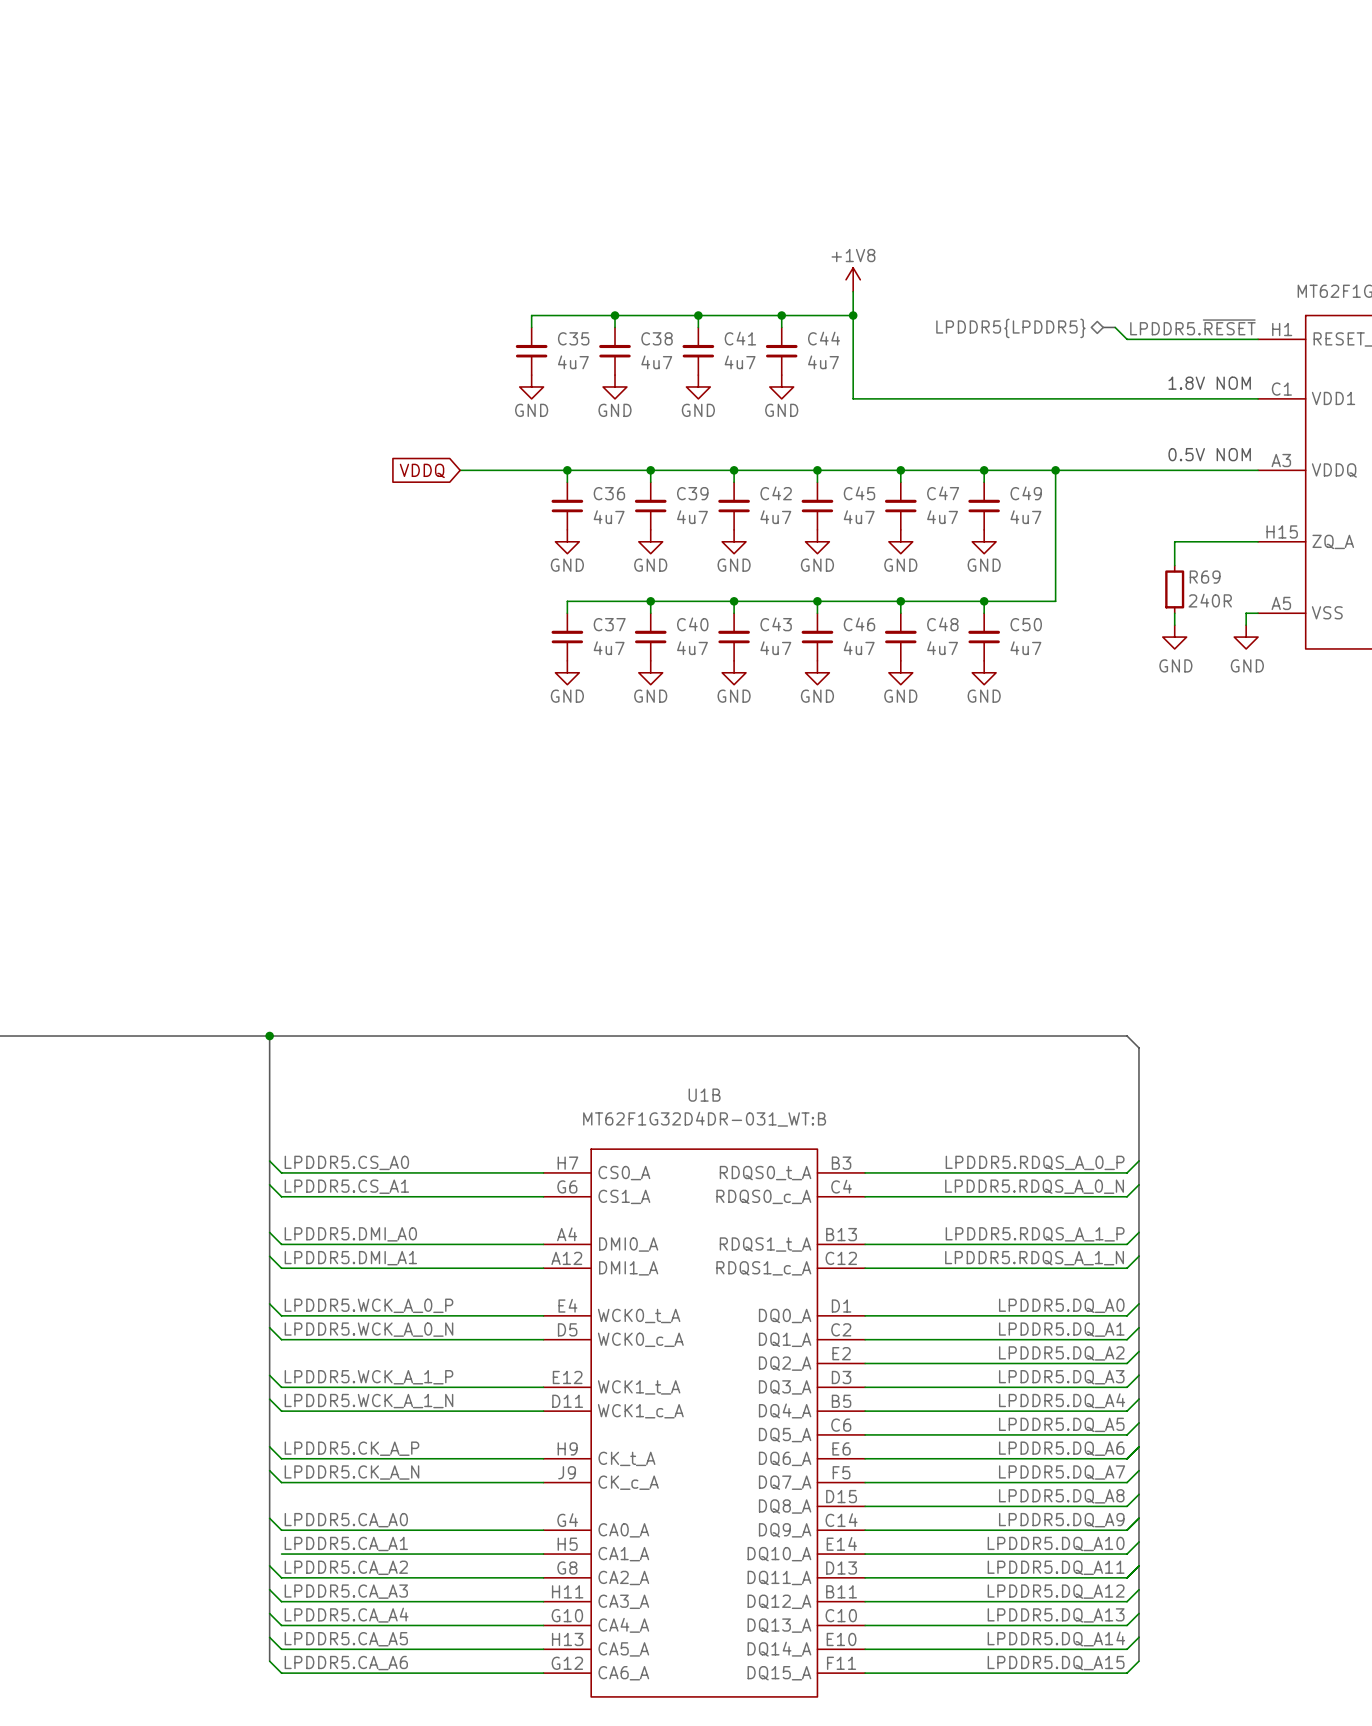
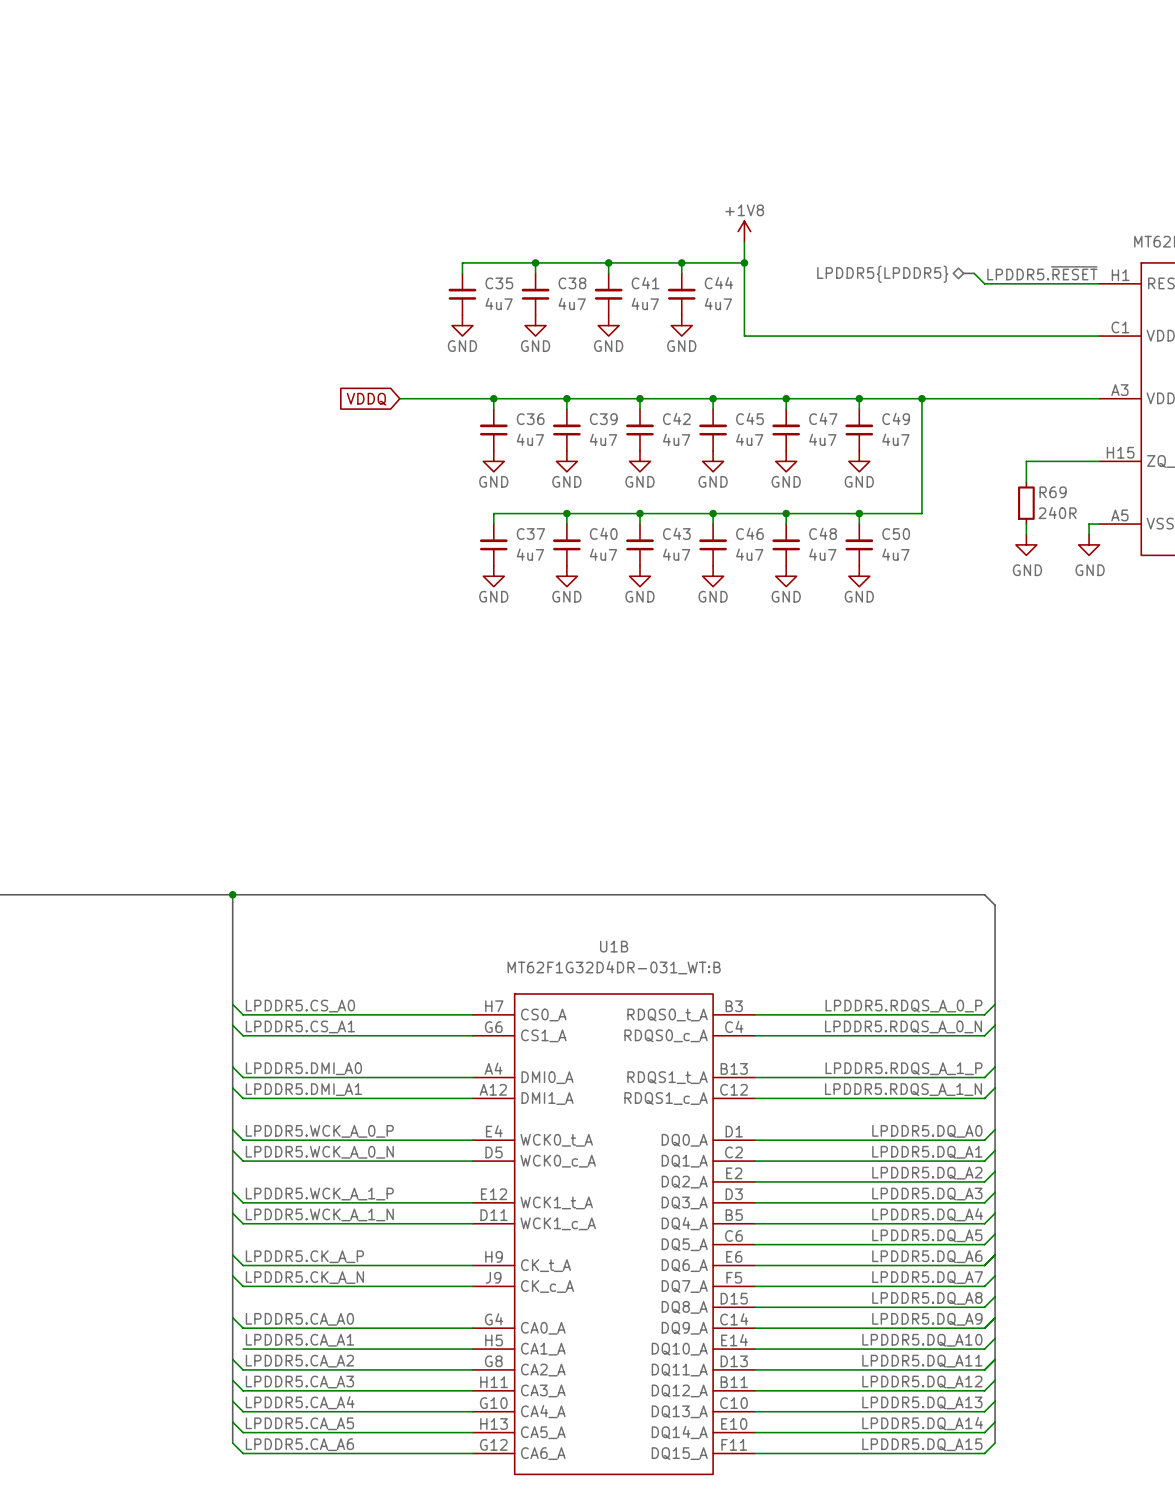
text: 1.8V NOM (1209, 383) -> none
text: 0.5V NOM (1209, 454) -> none

